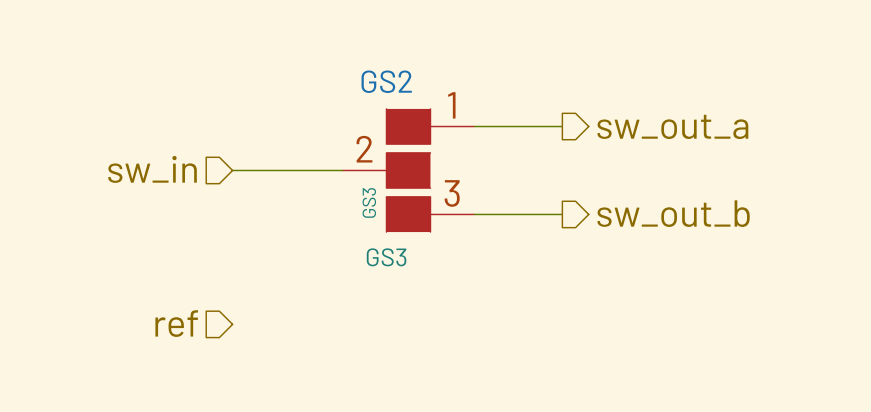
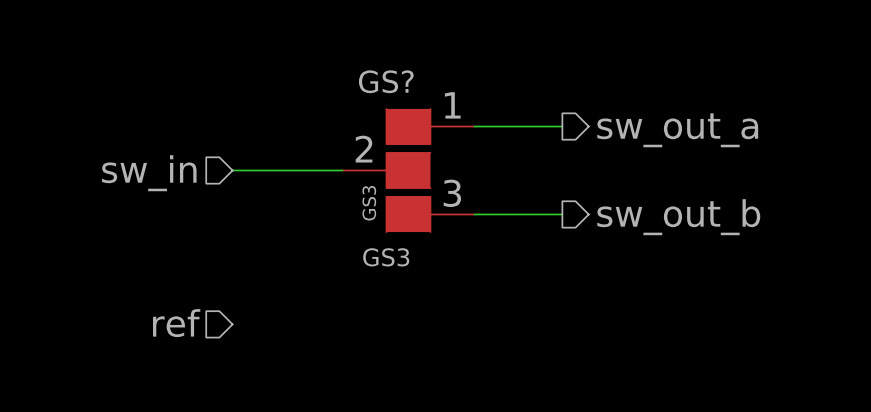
GS2 name: GS2 (386, 81) -> GS? (386, 81)

